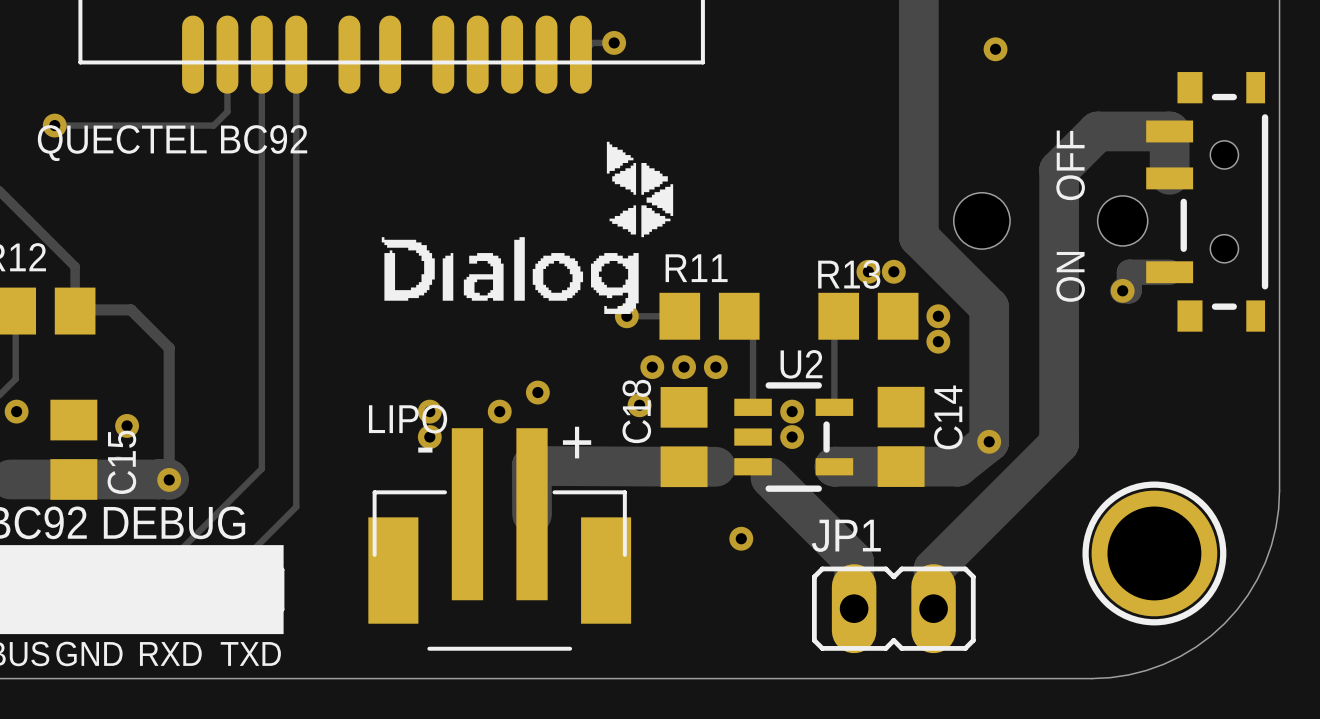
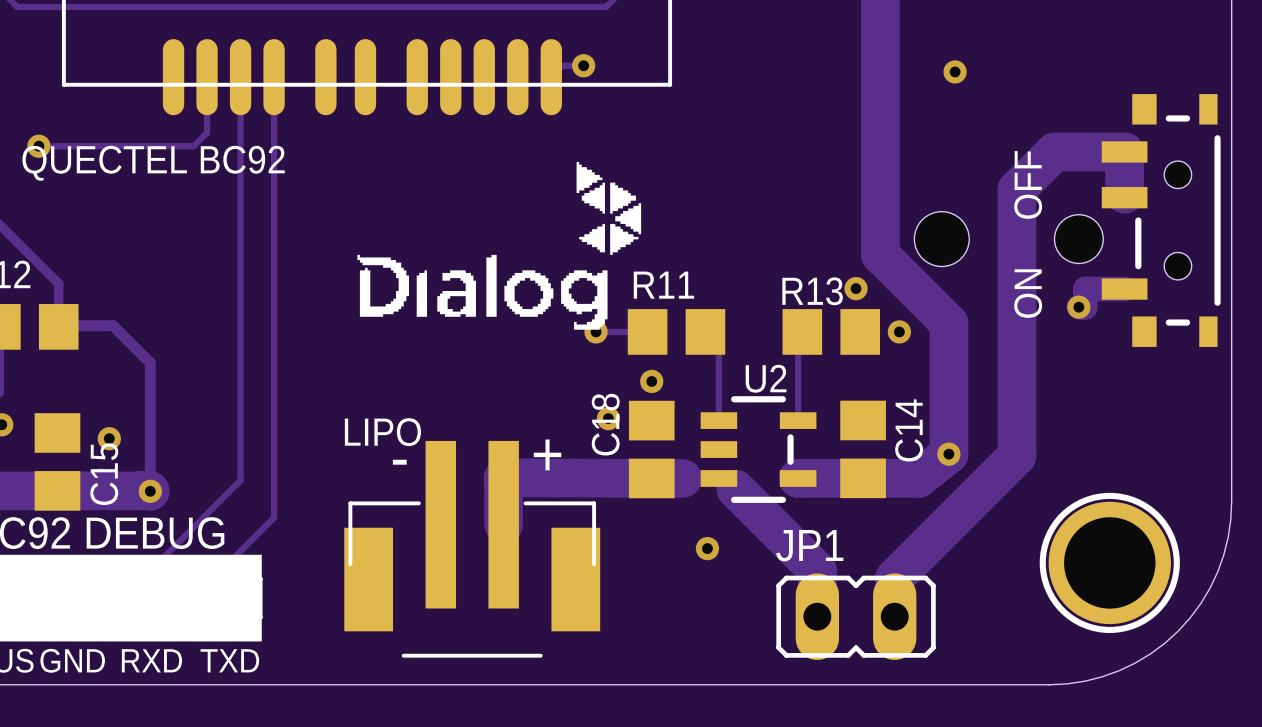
via: (868, 271) -> none
via: (938, 341) -> none
via: (652, 367) -> none
via: (715, 367) -> none
via: (537, 392) -> none
via: (429, 411) -> none
via: (499, 411) -> none
via: (792, 411) -> none
via: (429, 437) -> none
via: (792, 437) -> none

